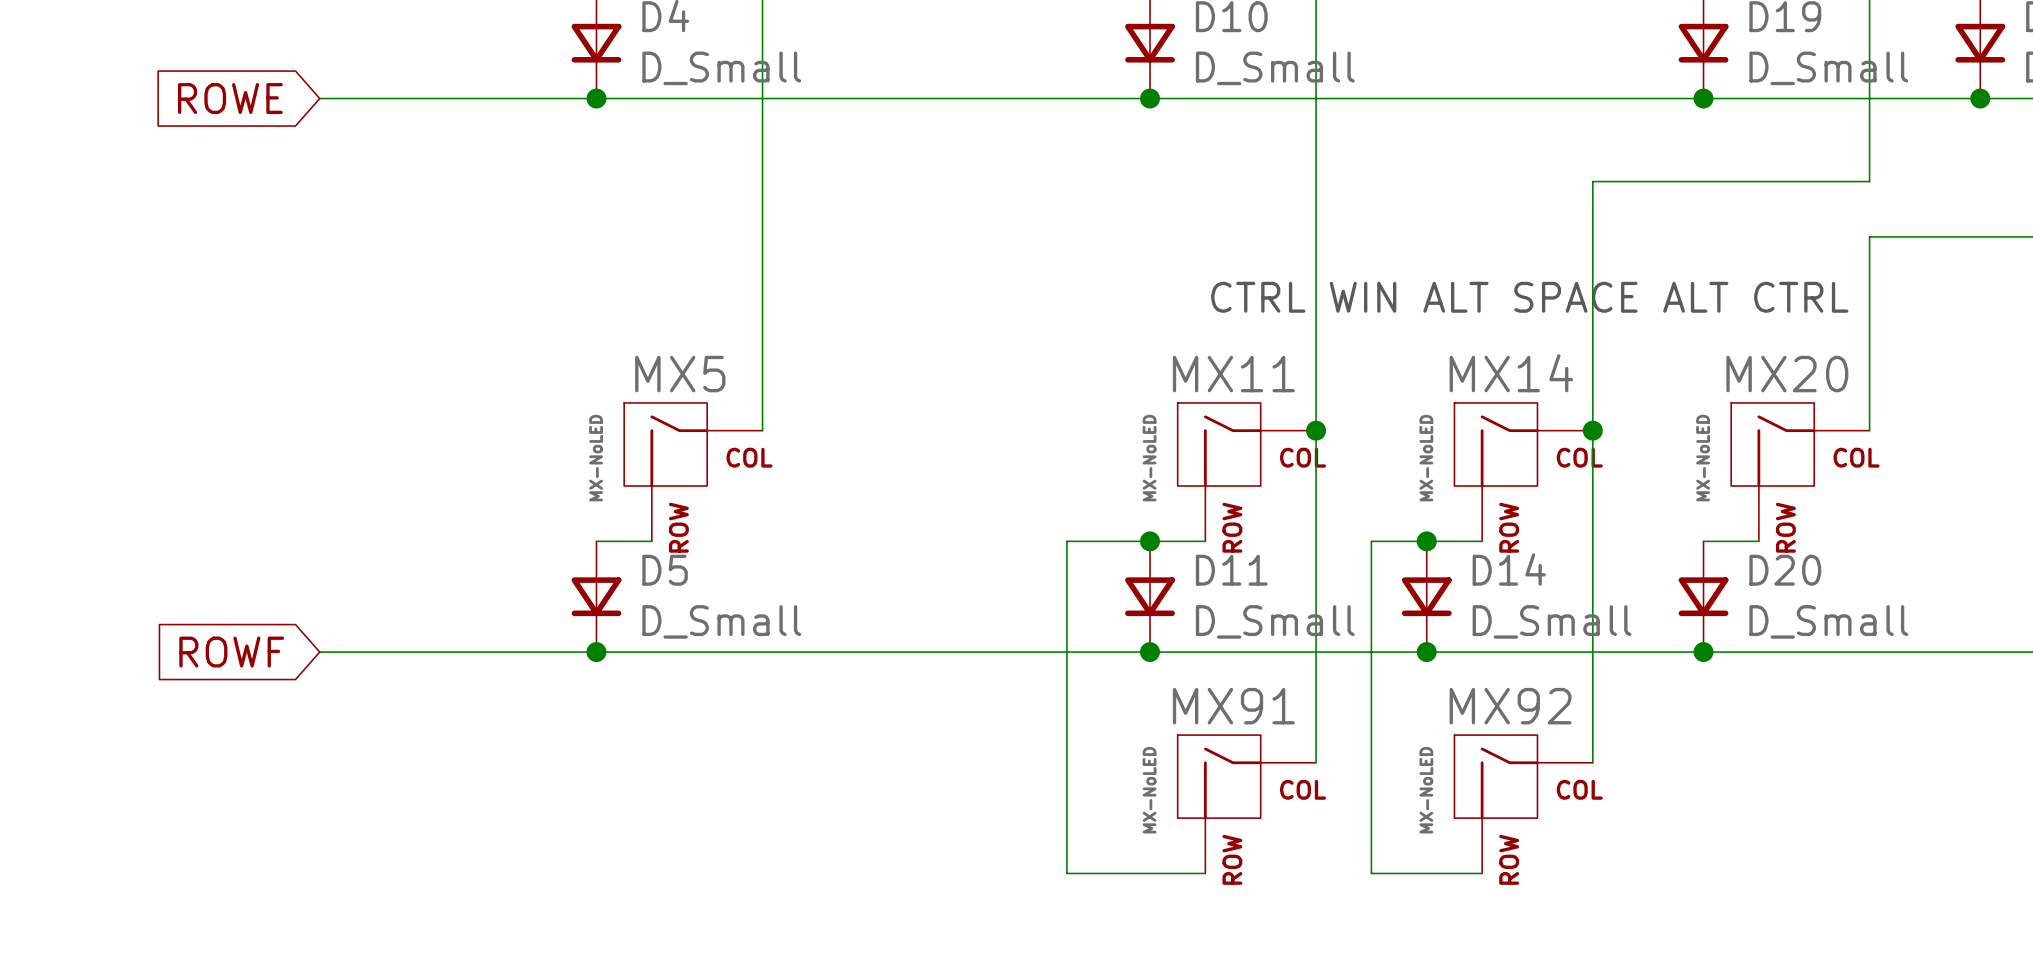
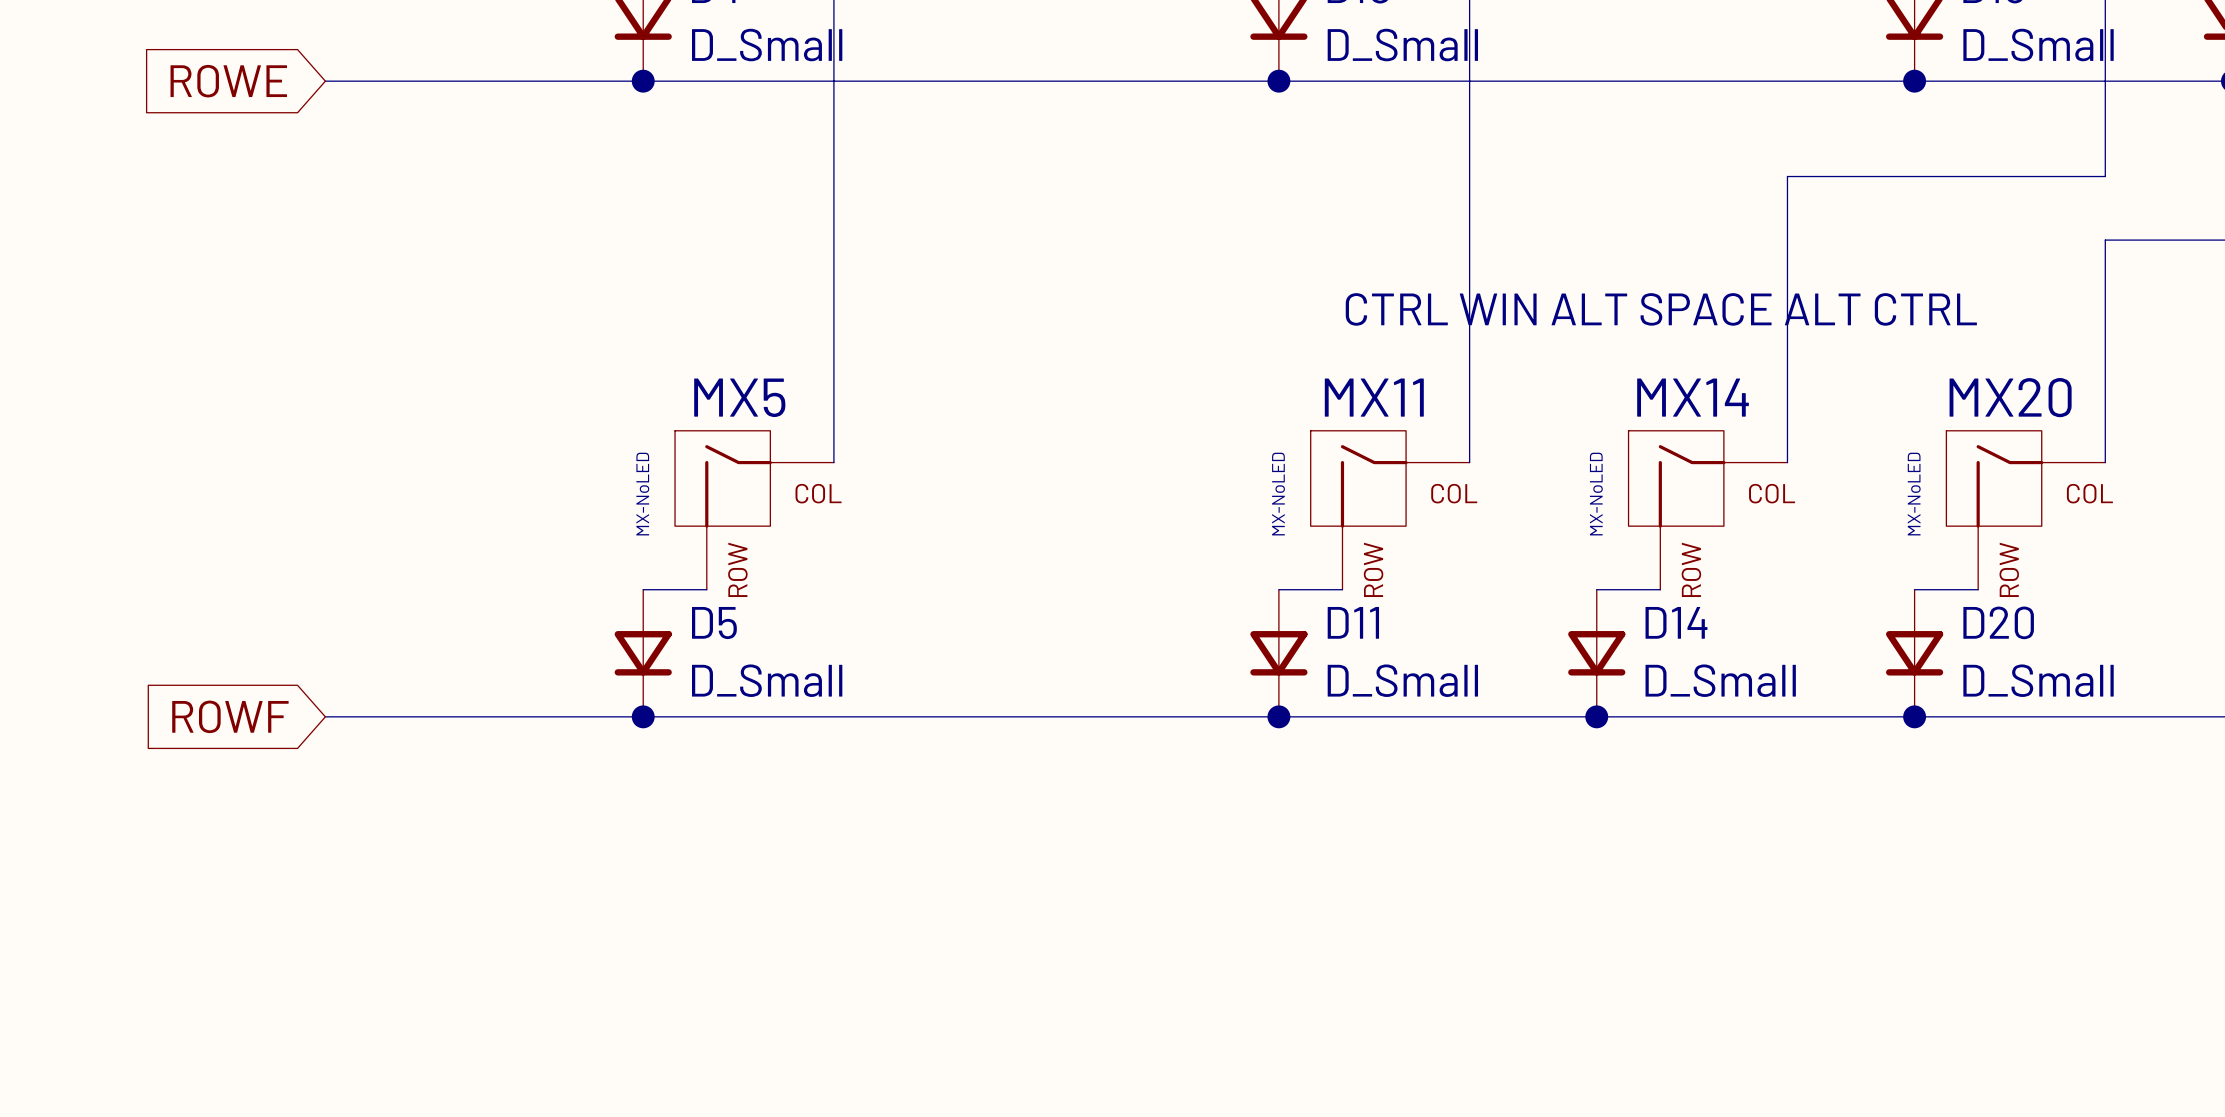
wire: (1316, 430) (1316, 762) -> none
junction: (1316, 430) -> none
wire: (1592, 430) (1592, 762) -> none
junction: (1592, 430) -> none
wire: (1150, 541) (1066, 541) (1066, 873) (1205, 873) -> none
junction: (1150, 541) -> none
wire: (1426, 541) (1371, 541) (1371, 873) (1482, 873) -> none
junction: (1426, 541) -> none
MX91: MX-NoLED (1246, 804) -> none
MX92: MX-NoLED (1523, 804) -> none

